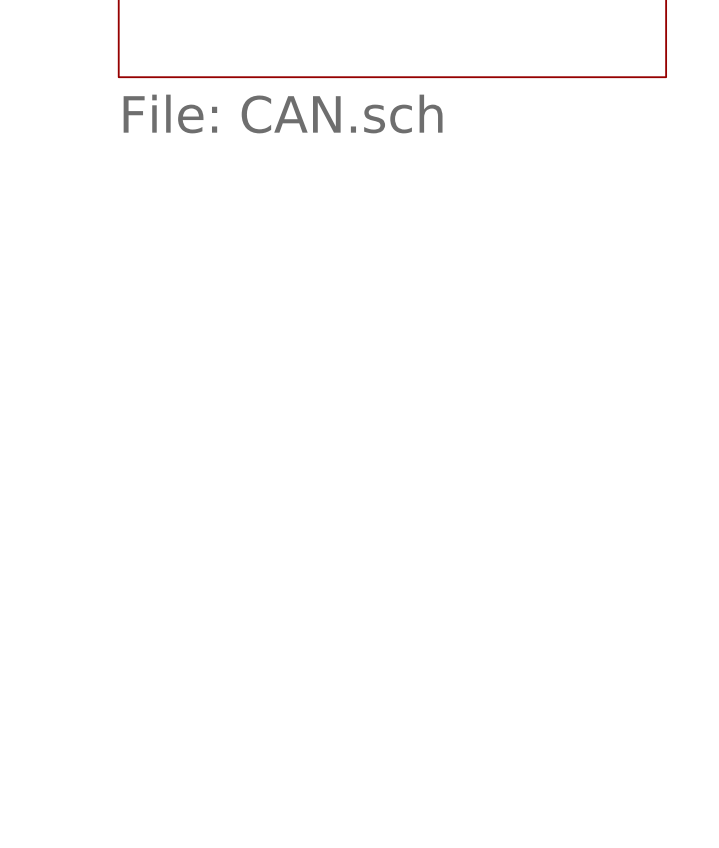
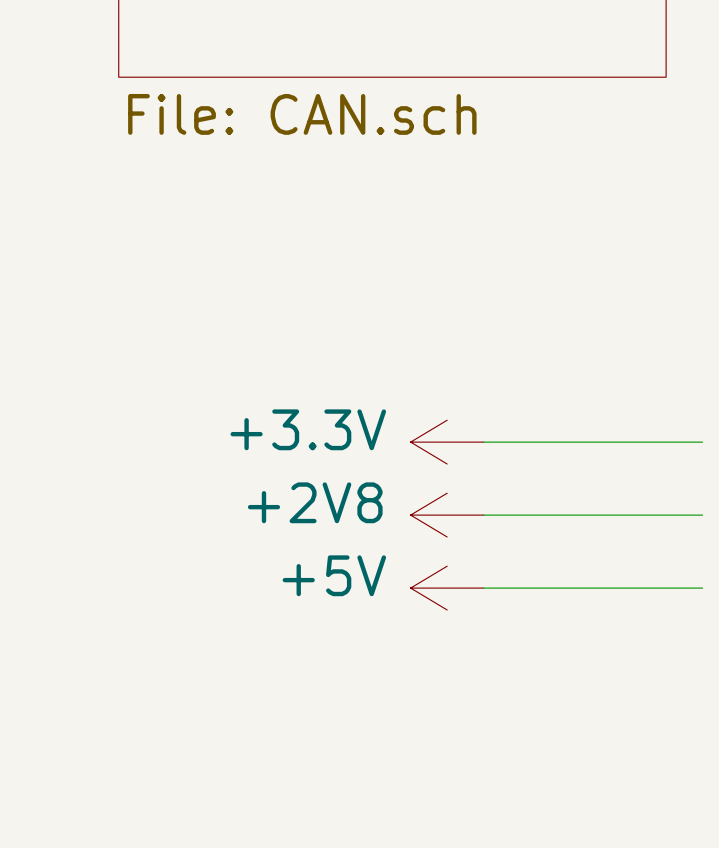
power symbol: none -> +3.3V (447, 442)
wire: none -> (483, 442) (702, 442)
power symbol: none -> +2V8 (447, 515)
wire: none -> (483, 515) (702, 515)
power symbol: none -> +5V (447, 588)
wire: none -> (483, 588) (702, 588)

